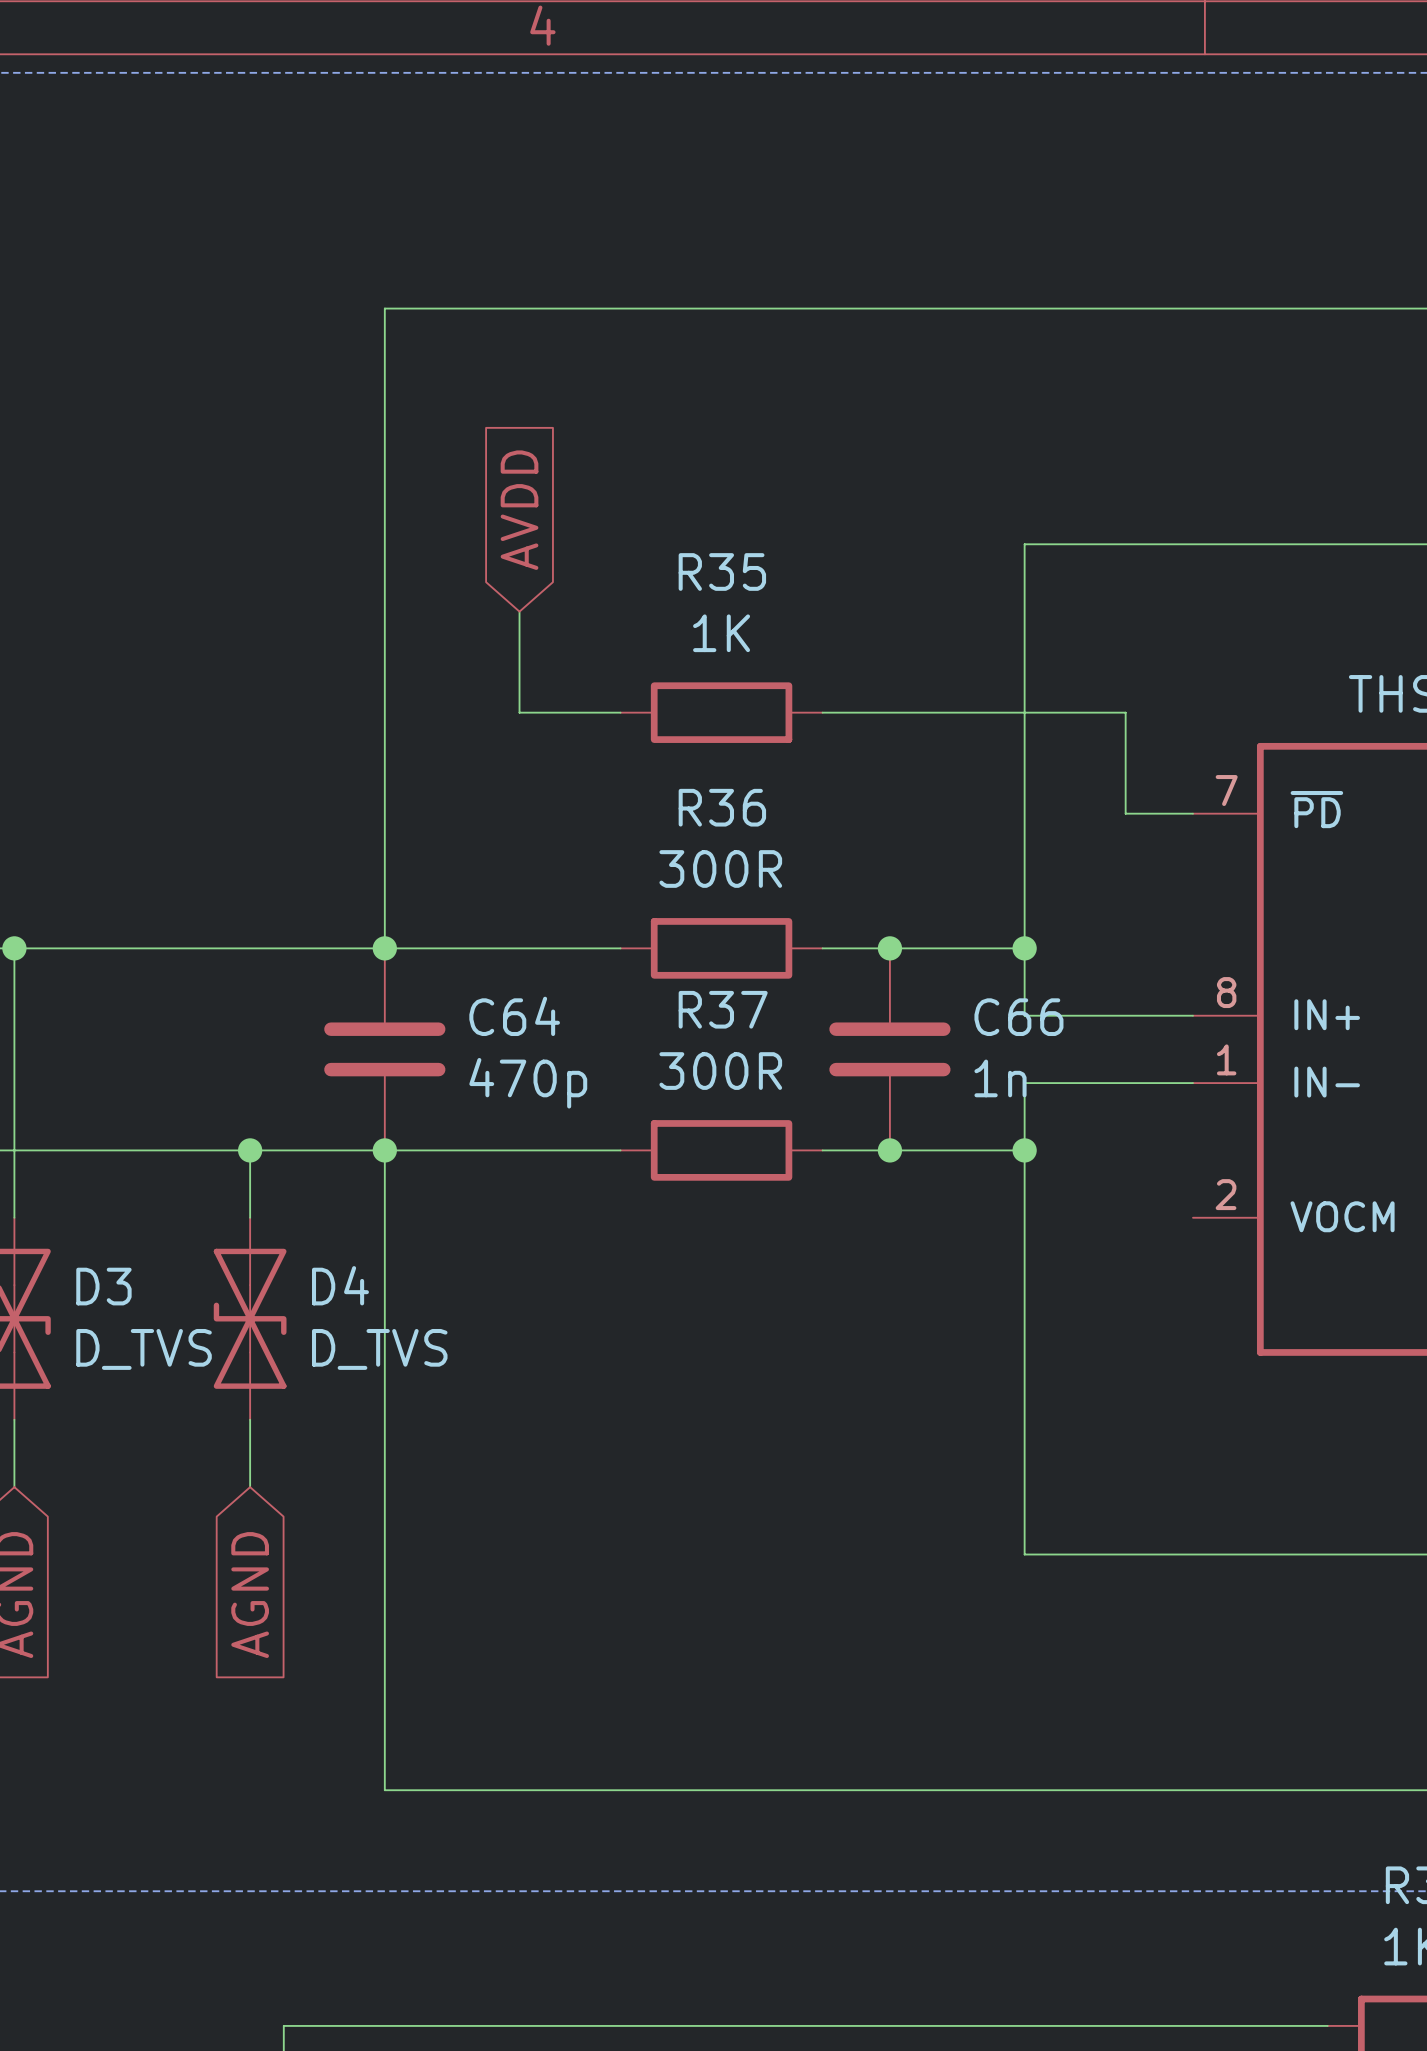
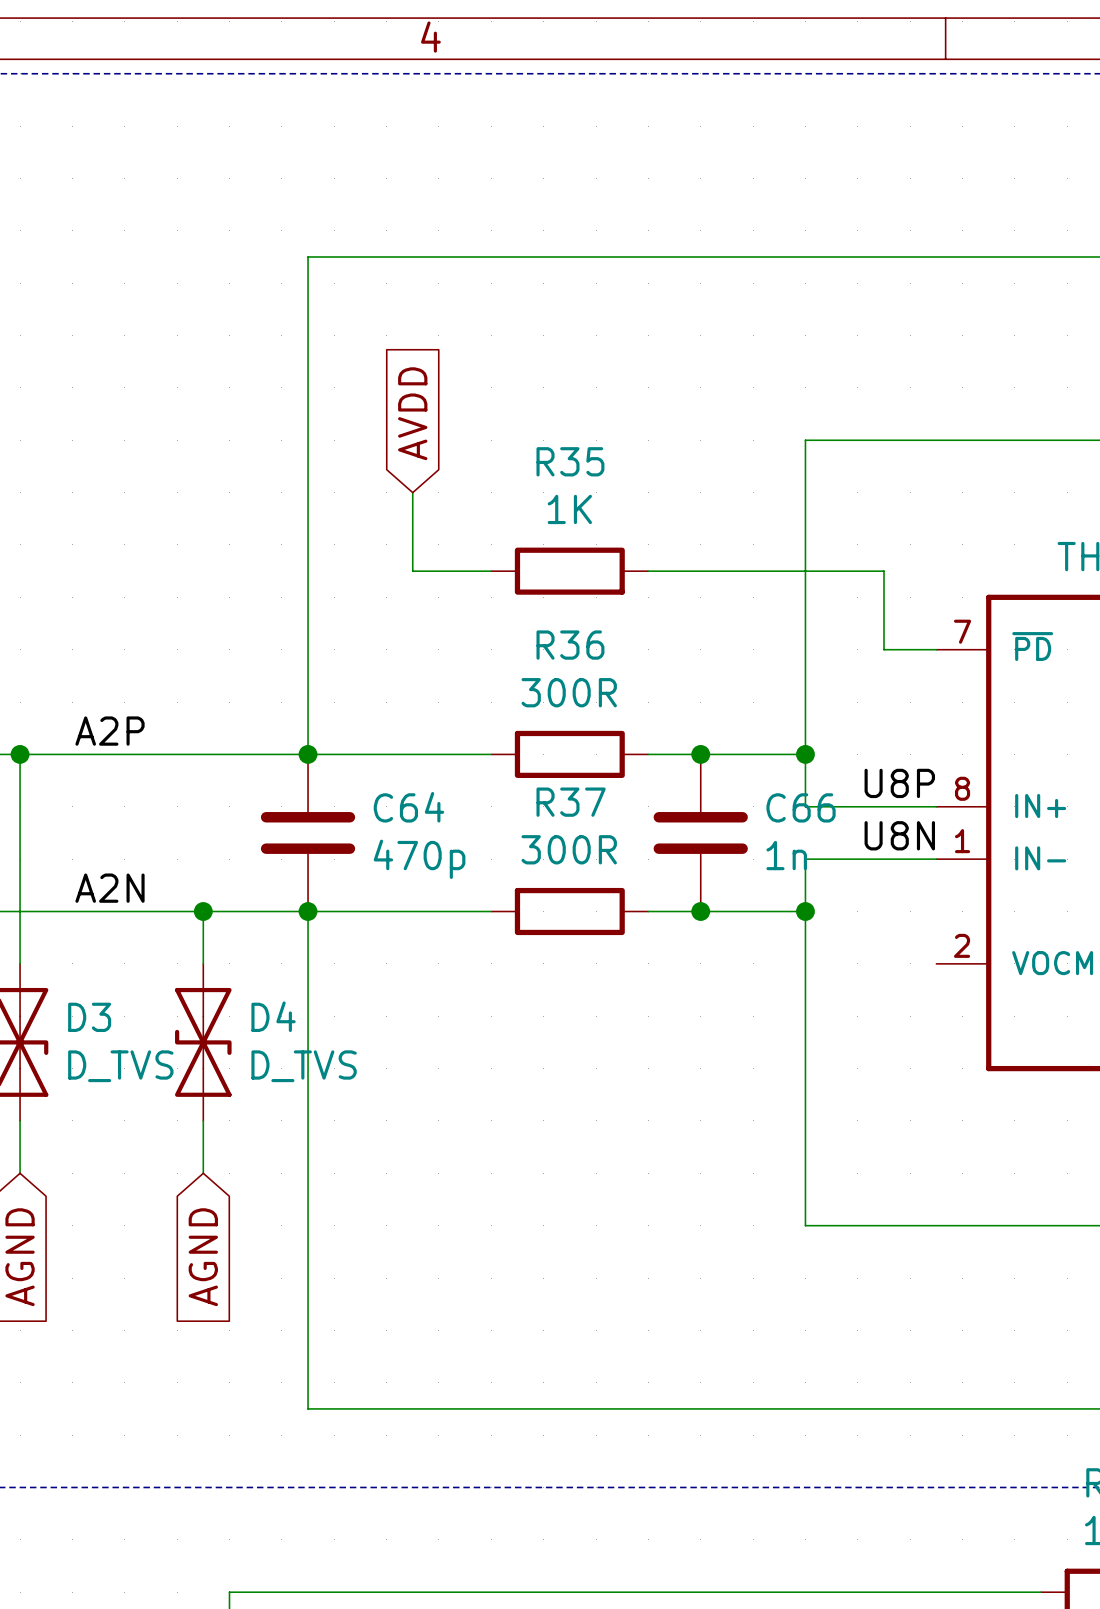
label: none -> A2P (110, 731)
label: none -> U8P (899, 783)
label: none -> U8N (899, 835)
label: none -> A2N (110, 888)

